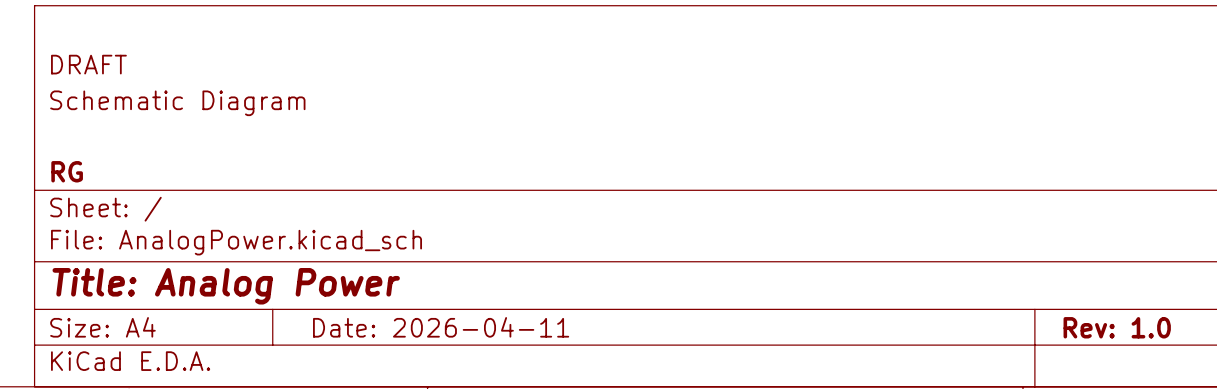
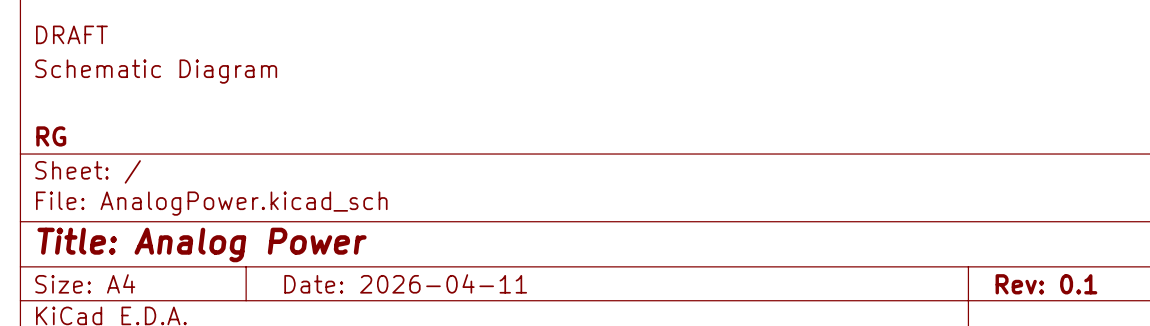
title block: Rev: 1.0 (1117, 327) -> Rev: 0.1 (1046, 284)

